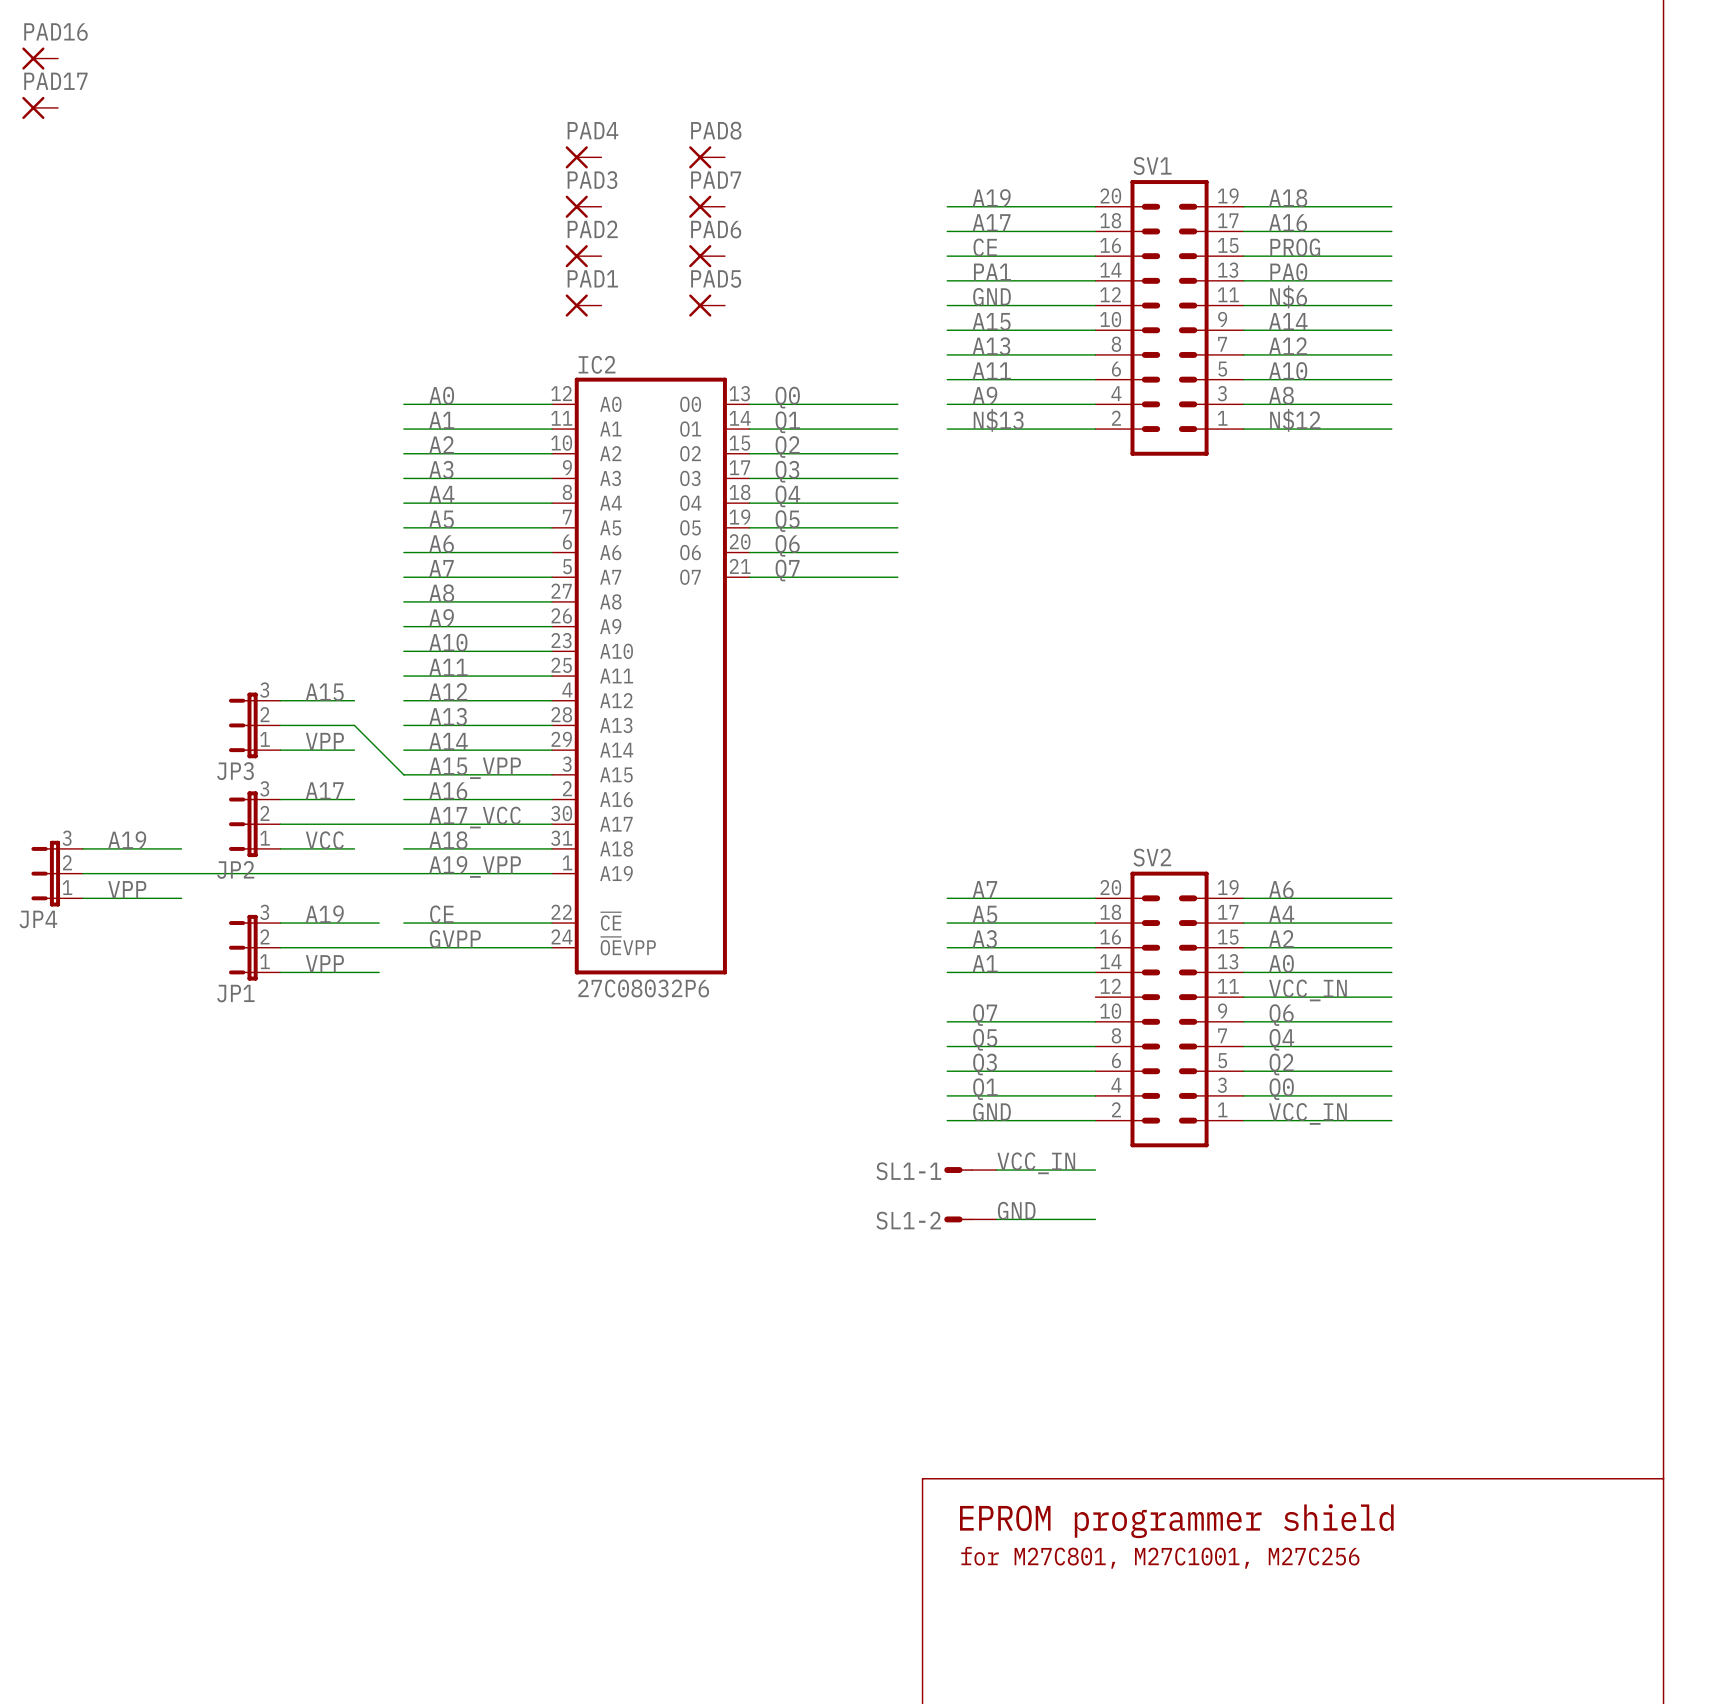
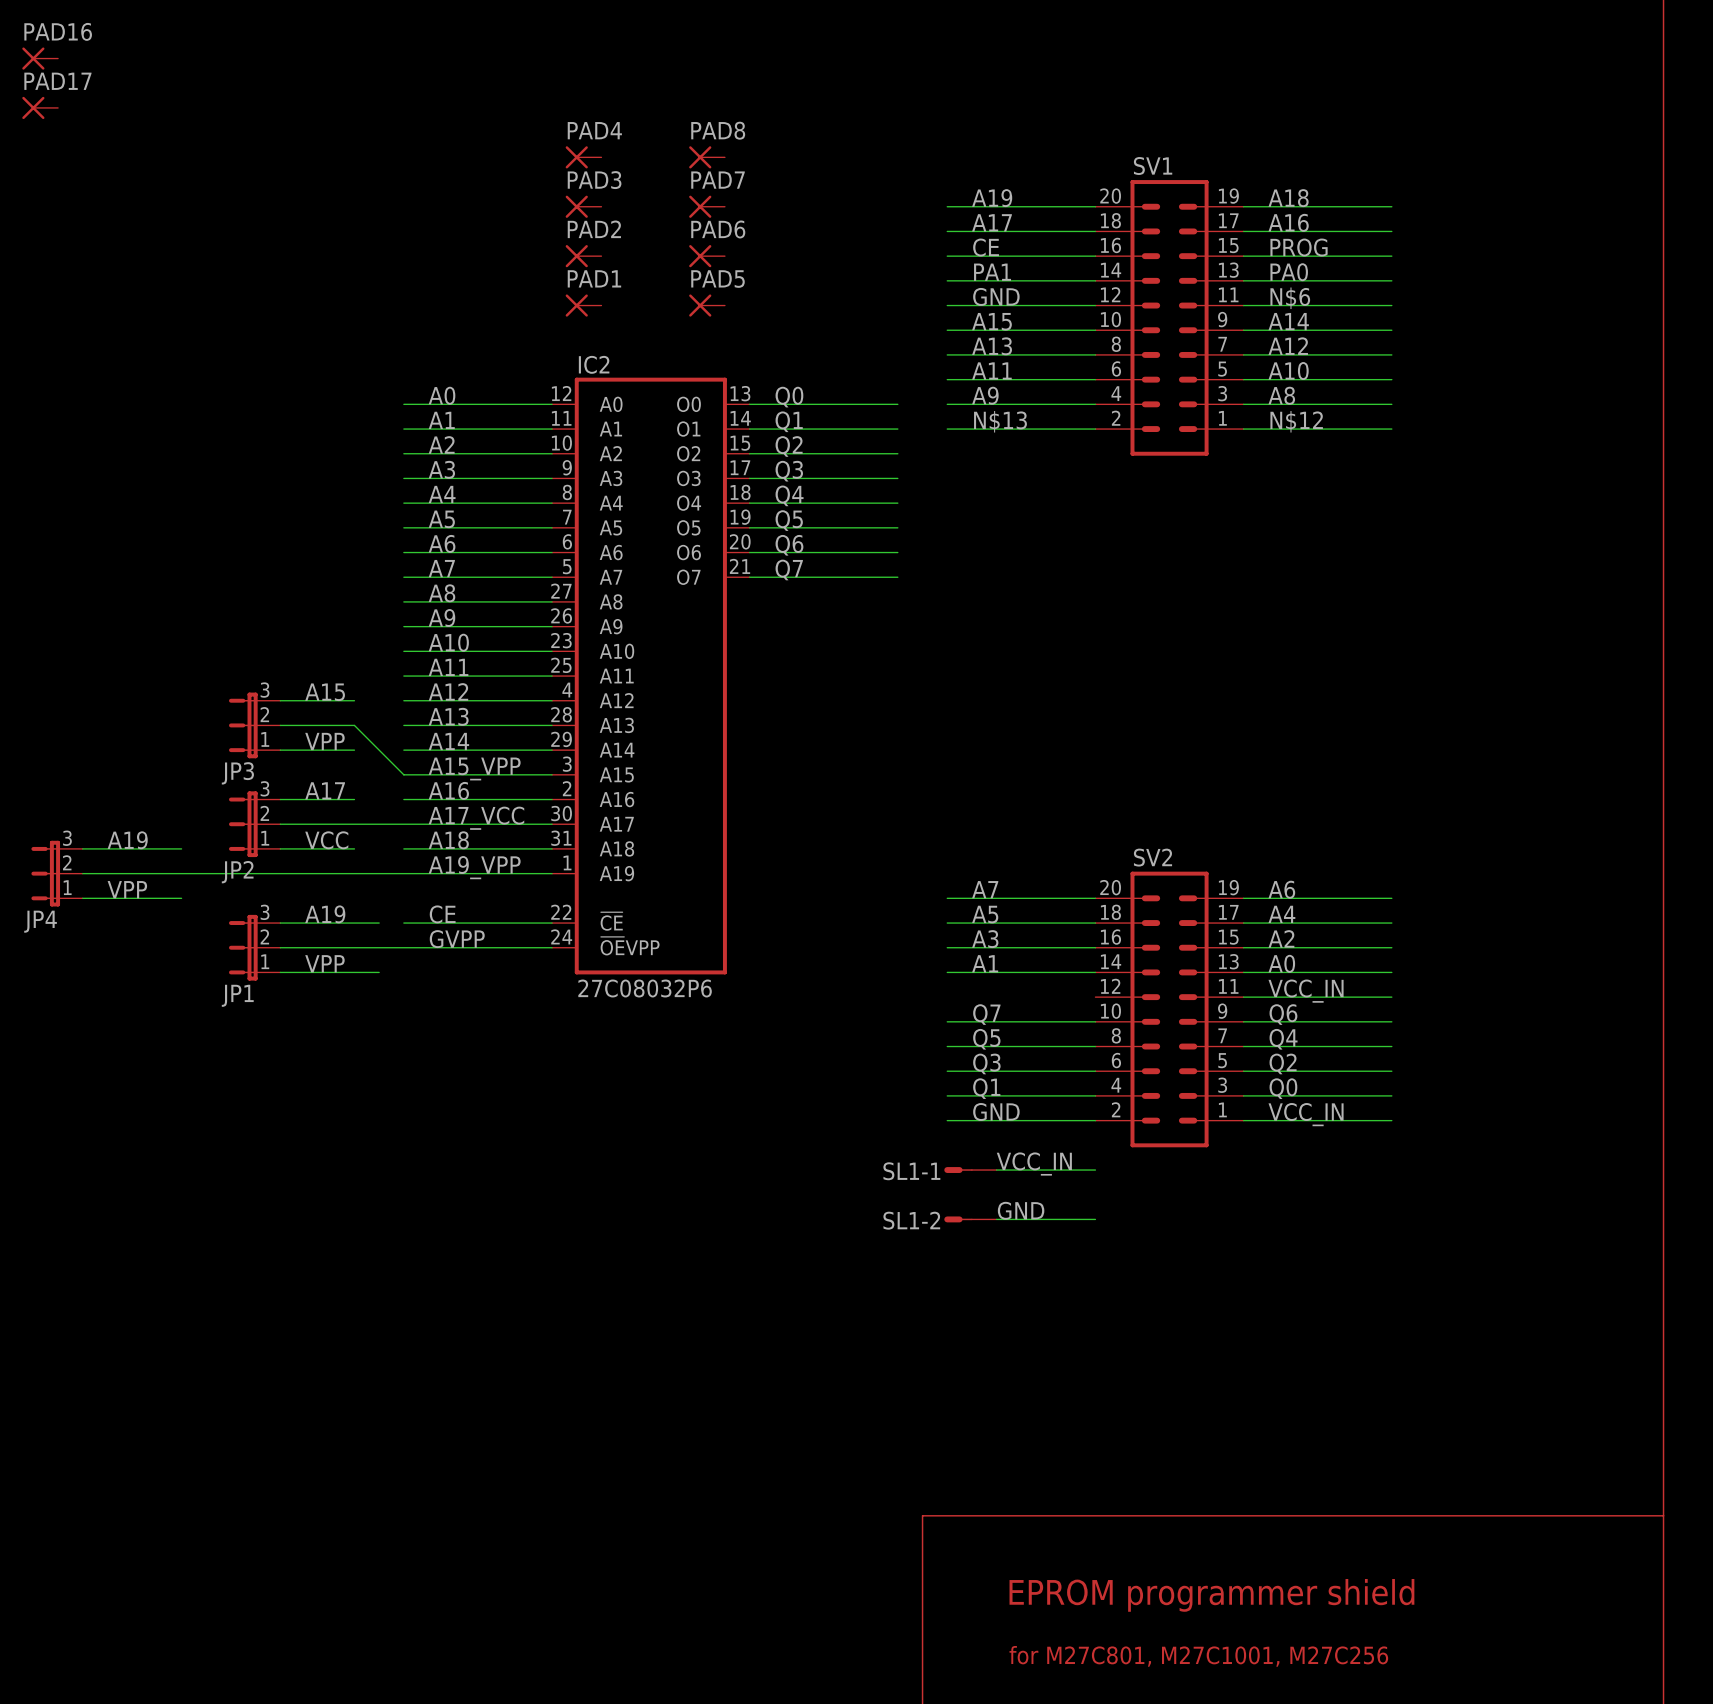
line: (1663, 1478) (922, 1478) (922, 1515) -> (1663, 1515) (922, 1515)
text position: EPROM programmer shield (1176, 1521) -> EPROM programmer shield (1211, 1595)
text position: for M27C801, M27C1001, M27C256 (1160, 1557) -> for M27C801, M27C1001, M27C256 (1198, 1656)

